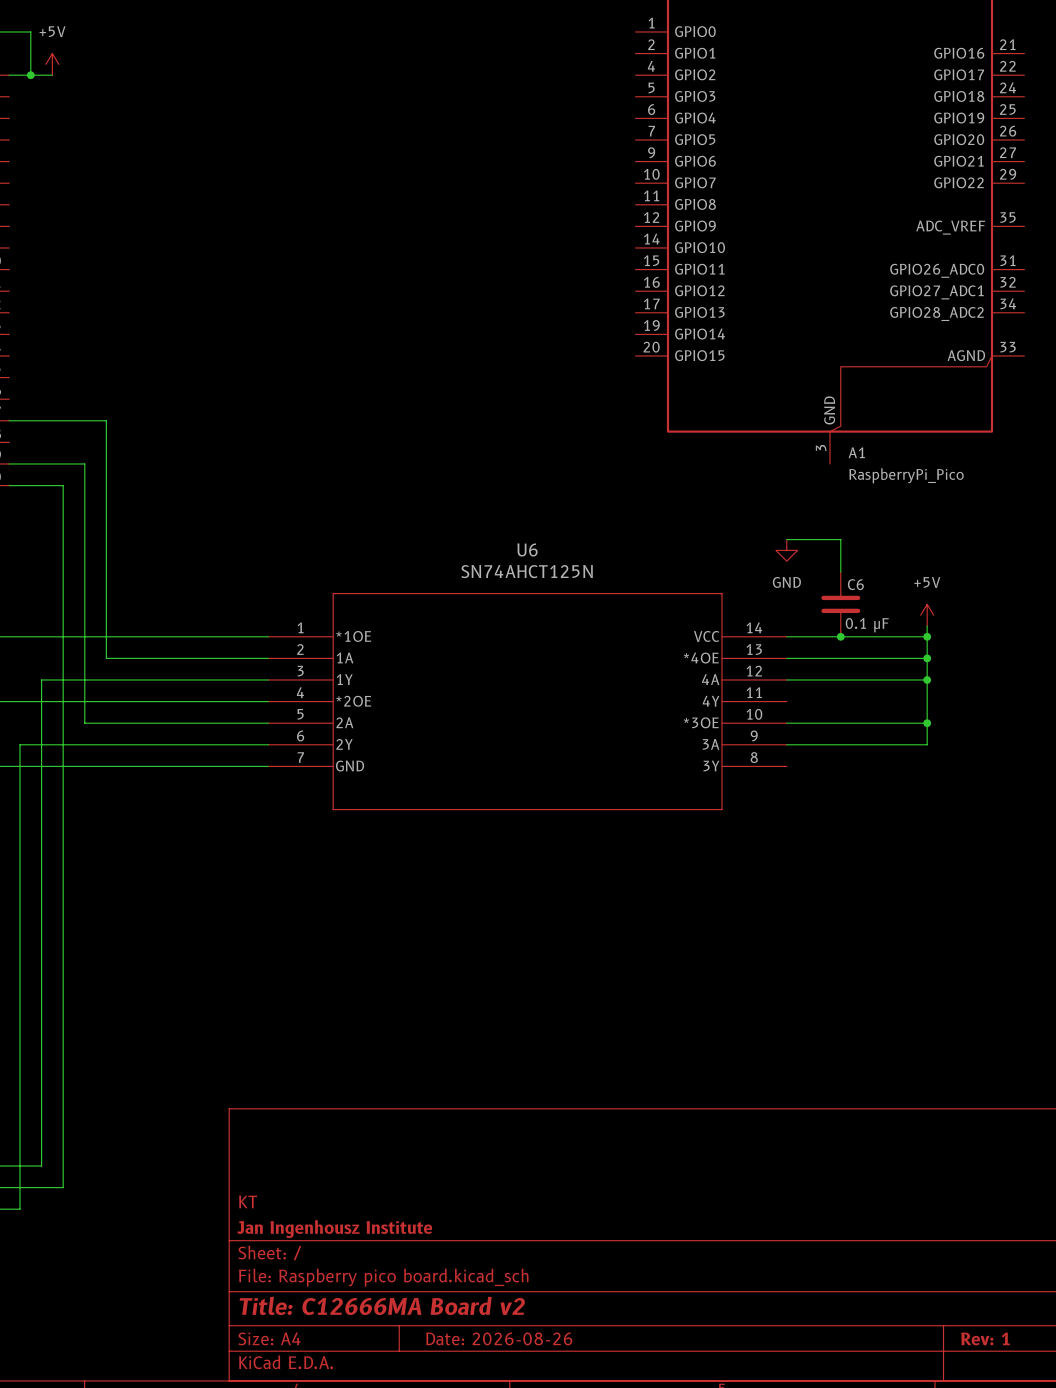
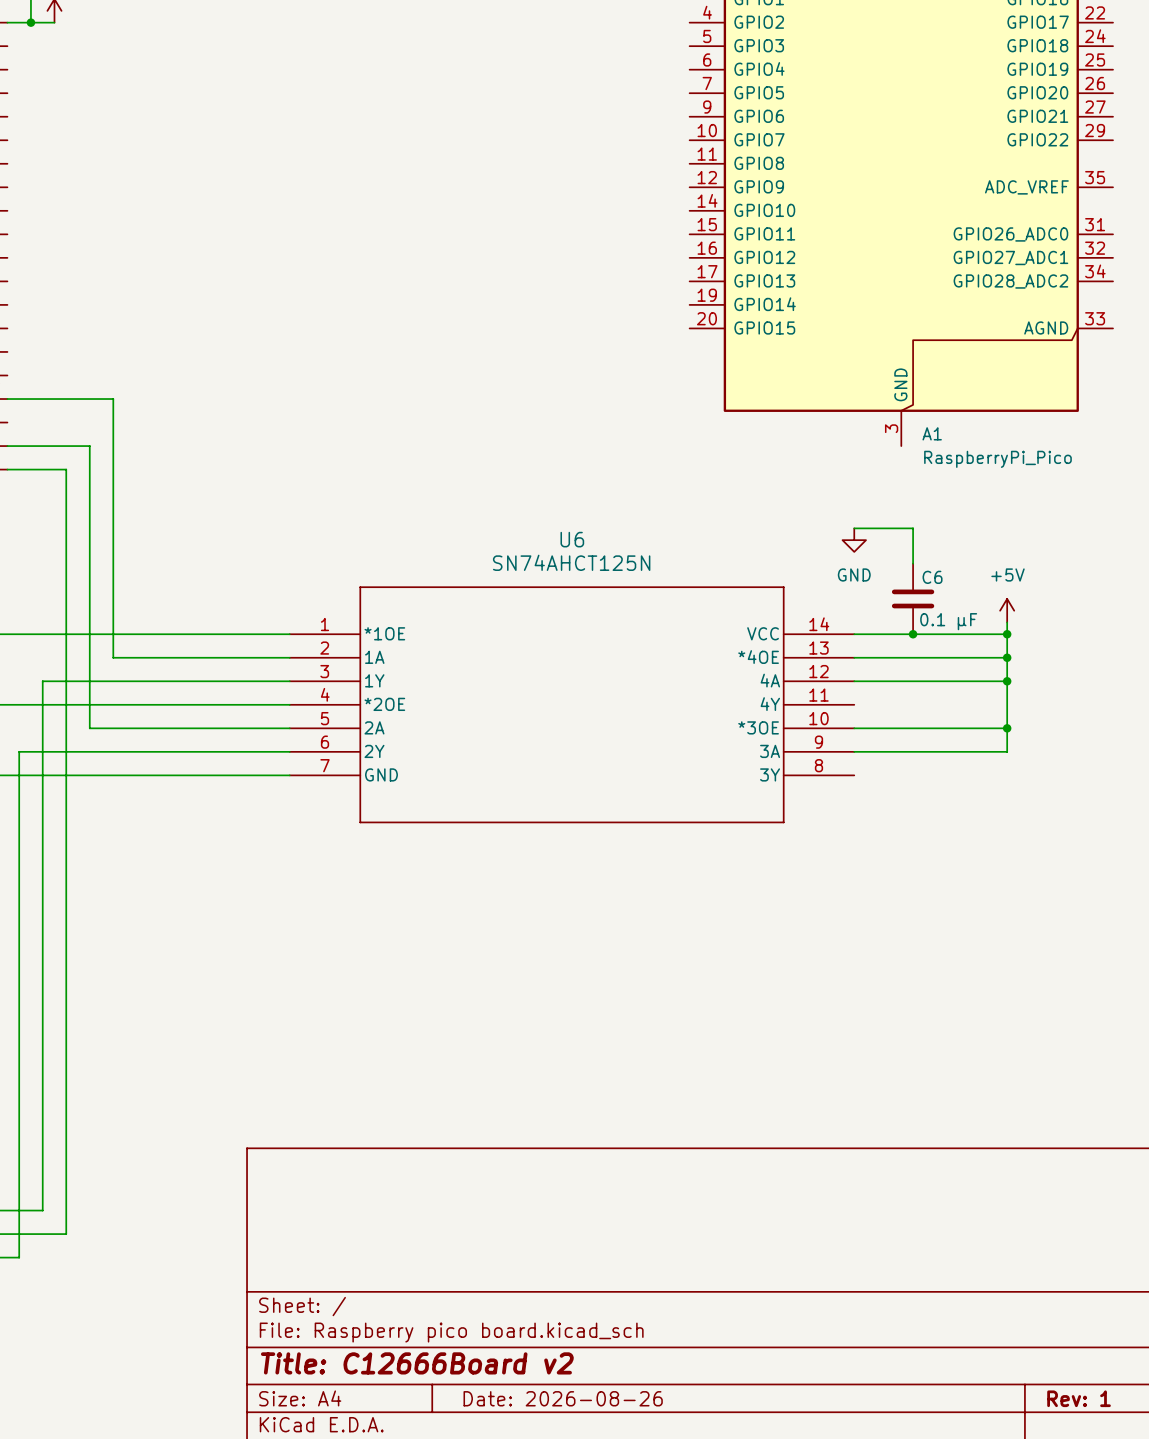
title block: KT (248, 1201) -> none
title block: Jan Ingenhousz Institute (334, 1229) -> none
title block: Title: C12666MA Board v2 (382, 1305) -> Title: C12666Board v2 (417, 1363)

